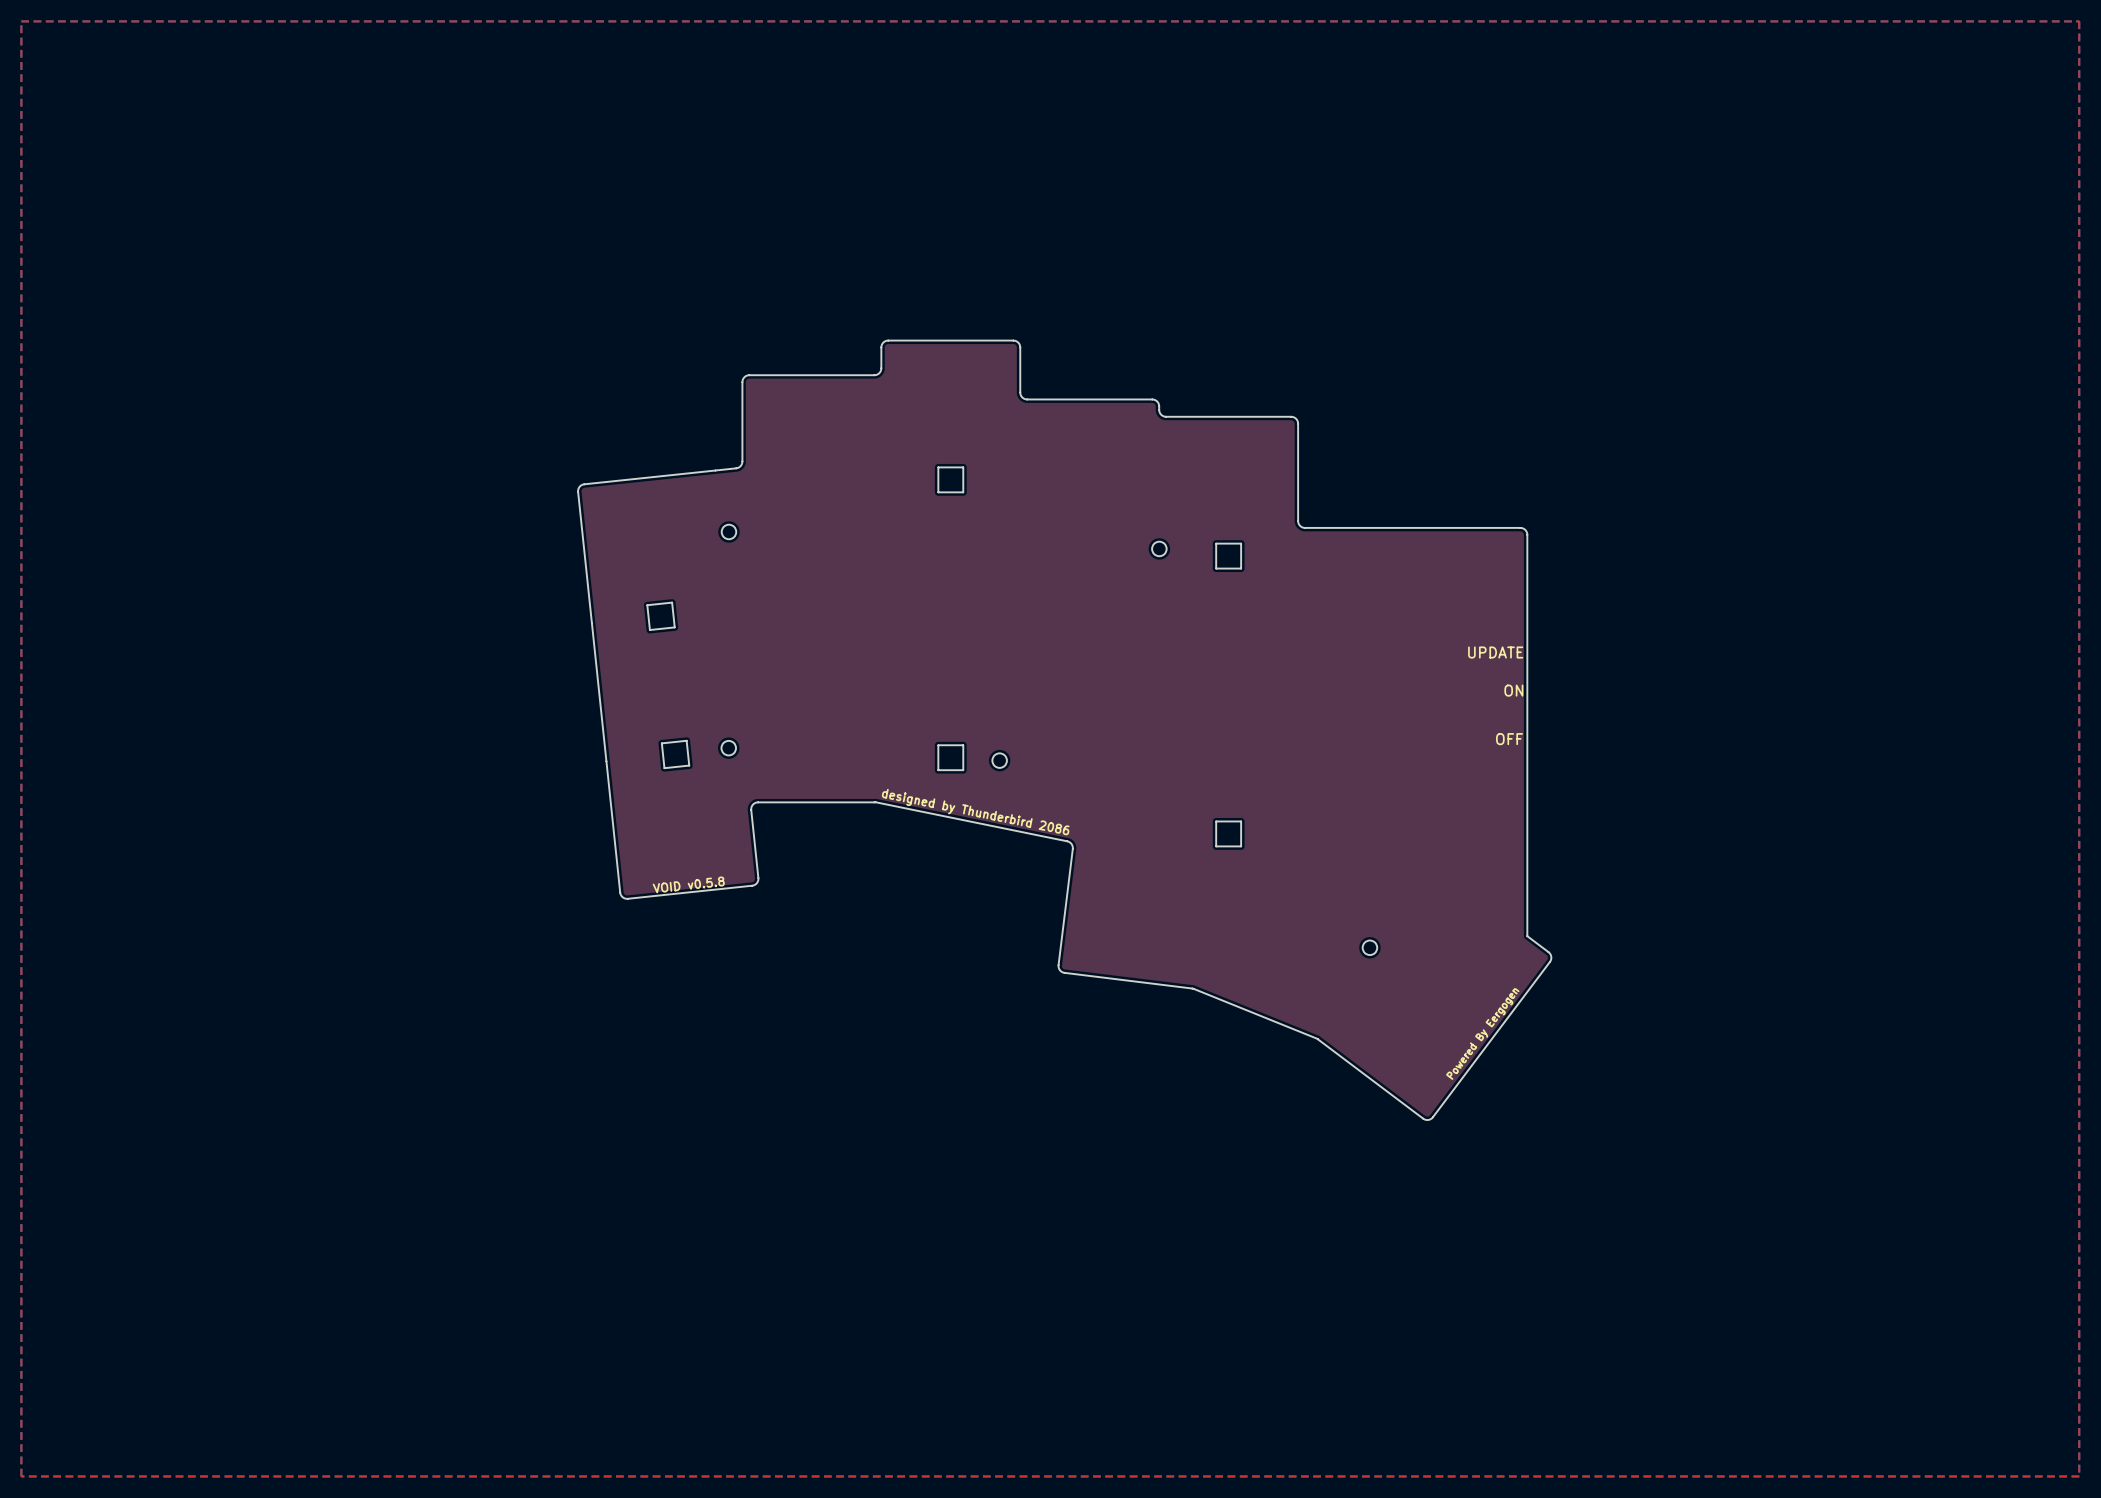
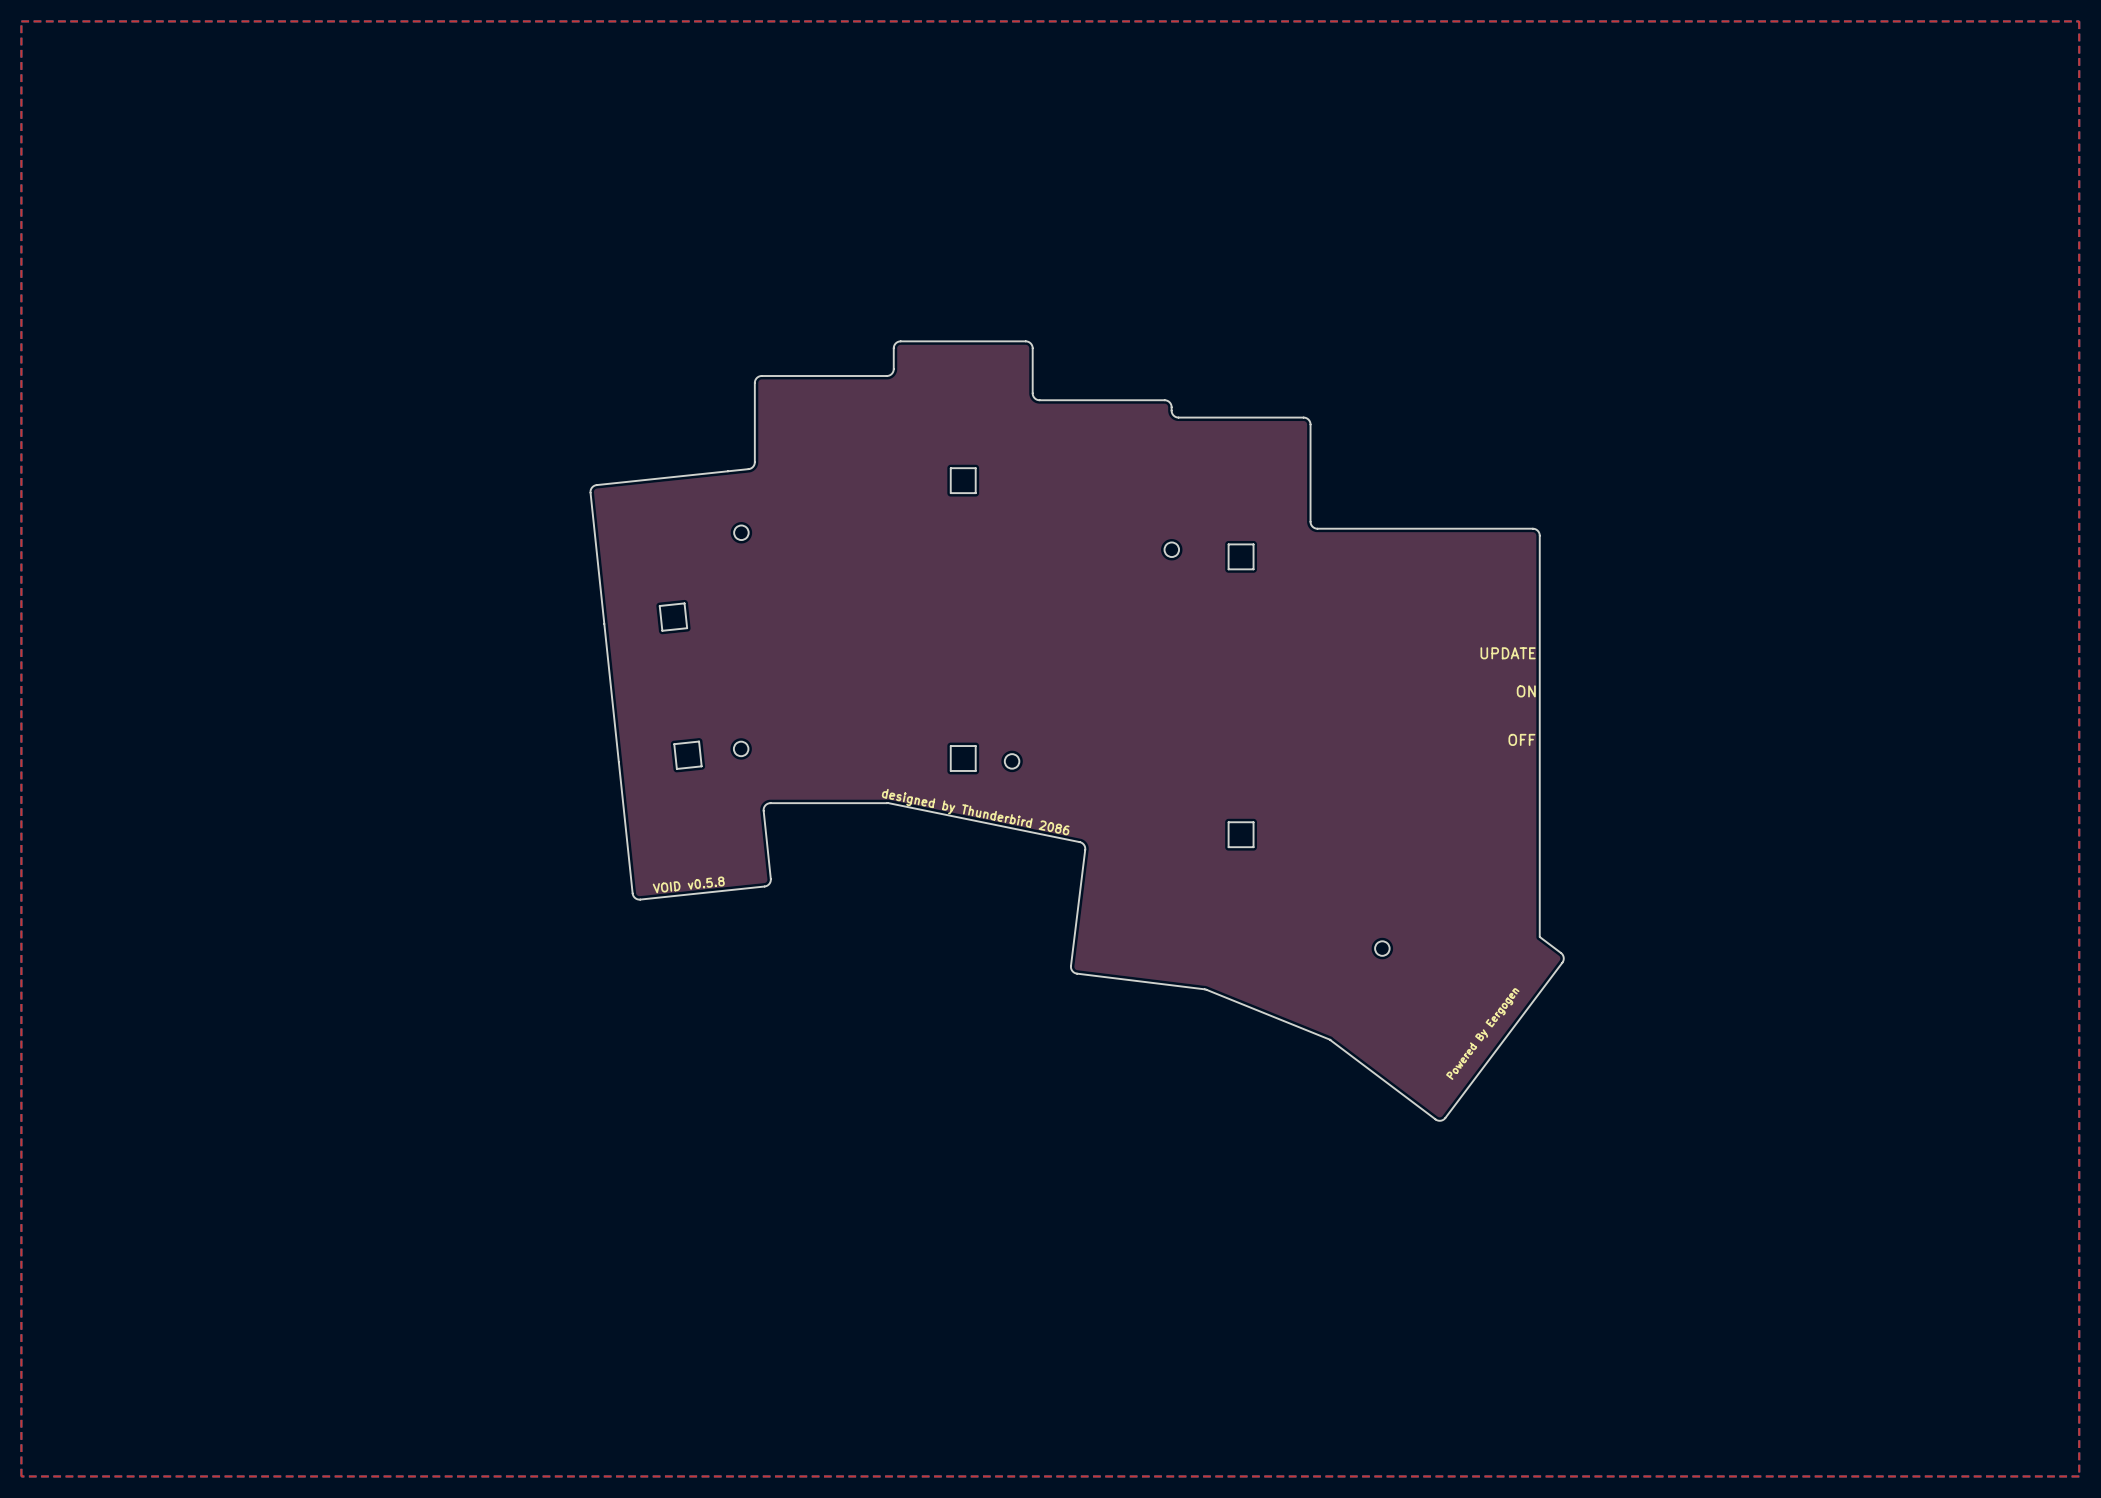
board edge: (888, 340) (1016, 341) (1020, 346) (1020, 393) (1026, 399) (1153, 399) (1158, 402) (1160, 413) (1165, 416) (1294, 417) (1298, 423) (1298, 521) (1303, 527) (1520, 527) (1526, 531) (1527, 936) (1549, 952) (1551, 959) (1431, 1118) (1423, 1118) (1317, 1039) (1194, 988) (1061, 971) (1058, 965) (1072, 848) (1068, 841) (875, 802) (757, 802) (752, 804) (751, 809) (758, 878) (755, 884) (627, 898) (621, 895) (578, 488) (584, 484) (738, 467) (742, 462) (742, 382) (745, 376) (875, 375) (881, 369) (881, 344) (888, 340) -> (900, 341) (894, 345) (893, 370) (888, 375) (757, 377) (754, 382) (754, 463) (751, 468) (596, 485) (591, 489) (633, 896) (640, 899) (767, 885) (770, 878) (763, 809) (765, 805) (769, 803) (888, 803) (1080, 842) (1085, 848) (1070, 965) (1073, 972) (1206, 989) (1330, 1039) (1435, 1119) (1444, 1119) (1563, 959) (1561, 953) (1539, 936) (1538, 531) (1532, 528) (1315, 528) (1310, 522) (1310, 424) (1306, 418) (1177, 417) (1172, 414) (1170, 403) (1165, 400) (1038, 400) (1032, 394) (1032, 347) (1028, 342) (900, 341)
board edge: (938, 467) (938, 492) (963, 492) (963, 467) (938, 467) -> (950, 468) (950, 493) (975, 493) (975, 468) (950, 468)
round board edge position: (728, 531) -> (741, 532)
board edge: (1216, 543) (1216, 568) (1241, 568) (1241, 543) (1216, 543) -> (1228, 544) (1228, 569) (1253, 569) (1253, 544) (1228, 544)
round board edge position: (1159, 548) -> (1171, 549)
board edge: (672, 602) (674, 627) (649, 630) (647, 605) (672, 602) -> (684, 603) (687, 628) (662, 630) (659, 606) (684, 603)
text position: UPDATE (1495, 652) -> UPDATE (1508, 653)
text position: ON (1513, 690) -> ON (1526, 691)
text position: OFF (1509, 739) -> OFF (1521, 739)
board edge: (686, 740) (689, 765) (664, 768) (661, 743) (686, 740) -> (699, 741) (701, 766) (676, 768) (674, 744) (699, 741)
board edge: (938, 745) (938, 770) (963, 770) (963, 745) (938, 745) -> (950, 746) (950, 770) (975, 770) (975, 746) (950, 746)
round board edge position: (728, 748) -> (741, 748)
round board edge position: (999, 760) -> (1012, 761)
board edge: (1216, 821) (1241, 821) (1241, 846) (1216, 846) (1216, 821) -> (1228, 822) (1253, 822) (1253, 847) (1228, 847) (1228, 822)
round board edge position: (1369, 947) -> (1382, 948)

